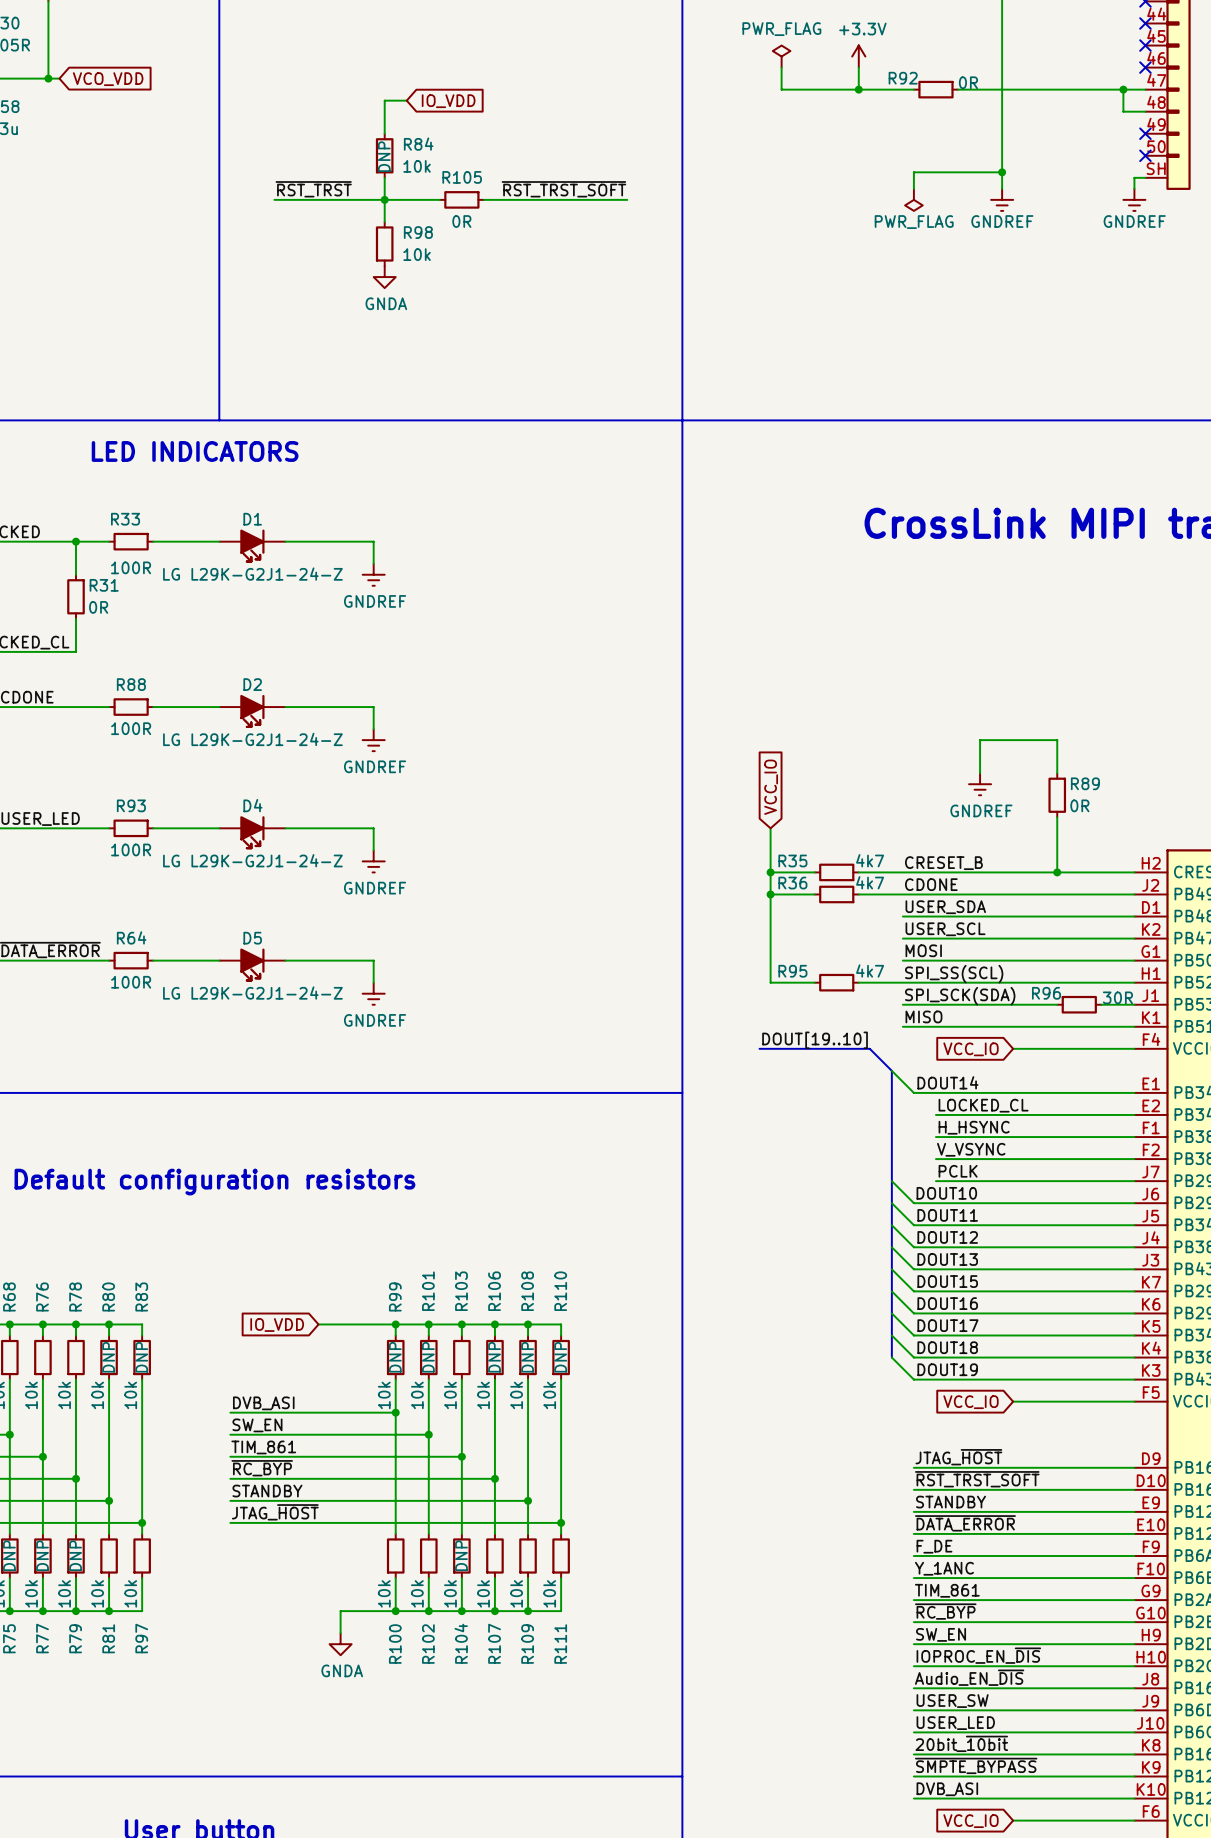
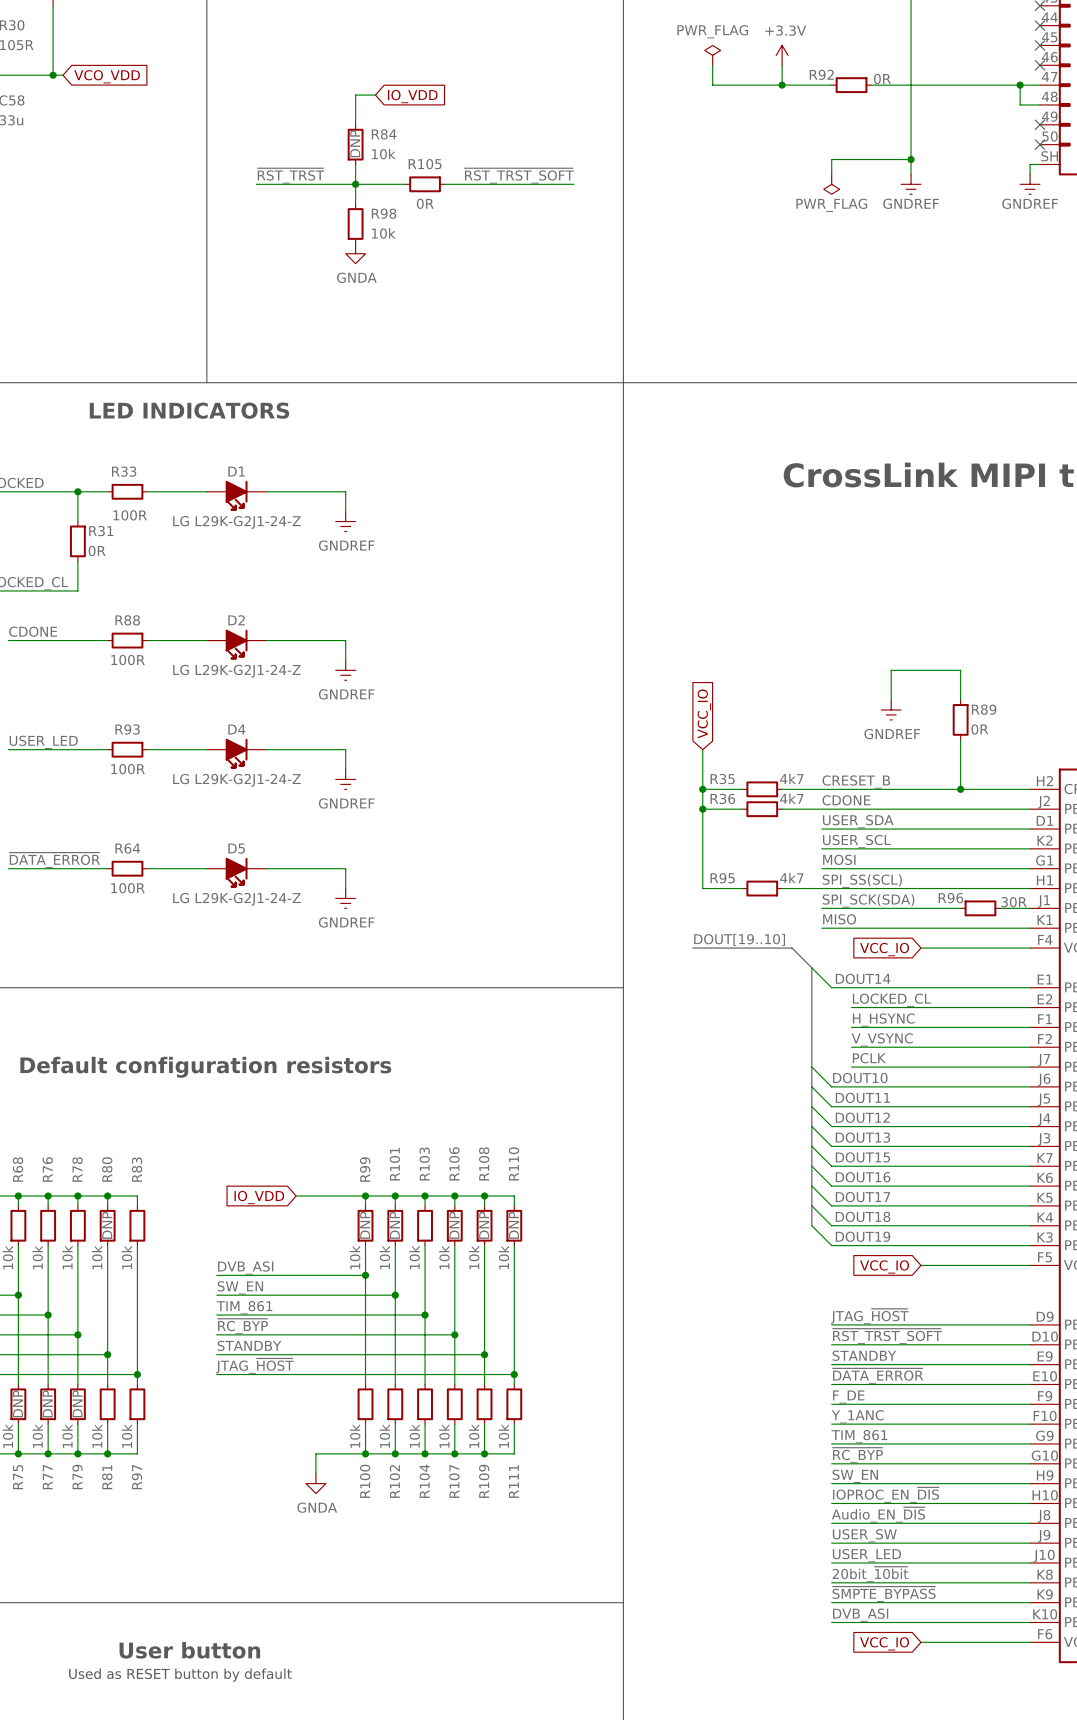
R83 text: DNP (141, 1357) -> none
R104 text: DNP (461, 1555) -> none

